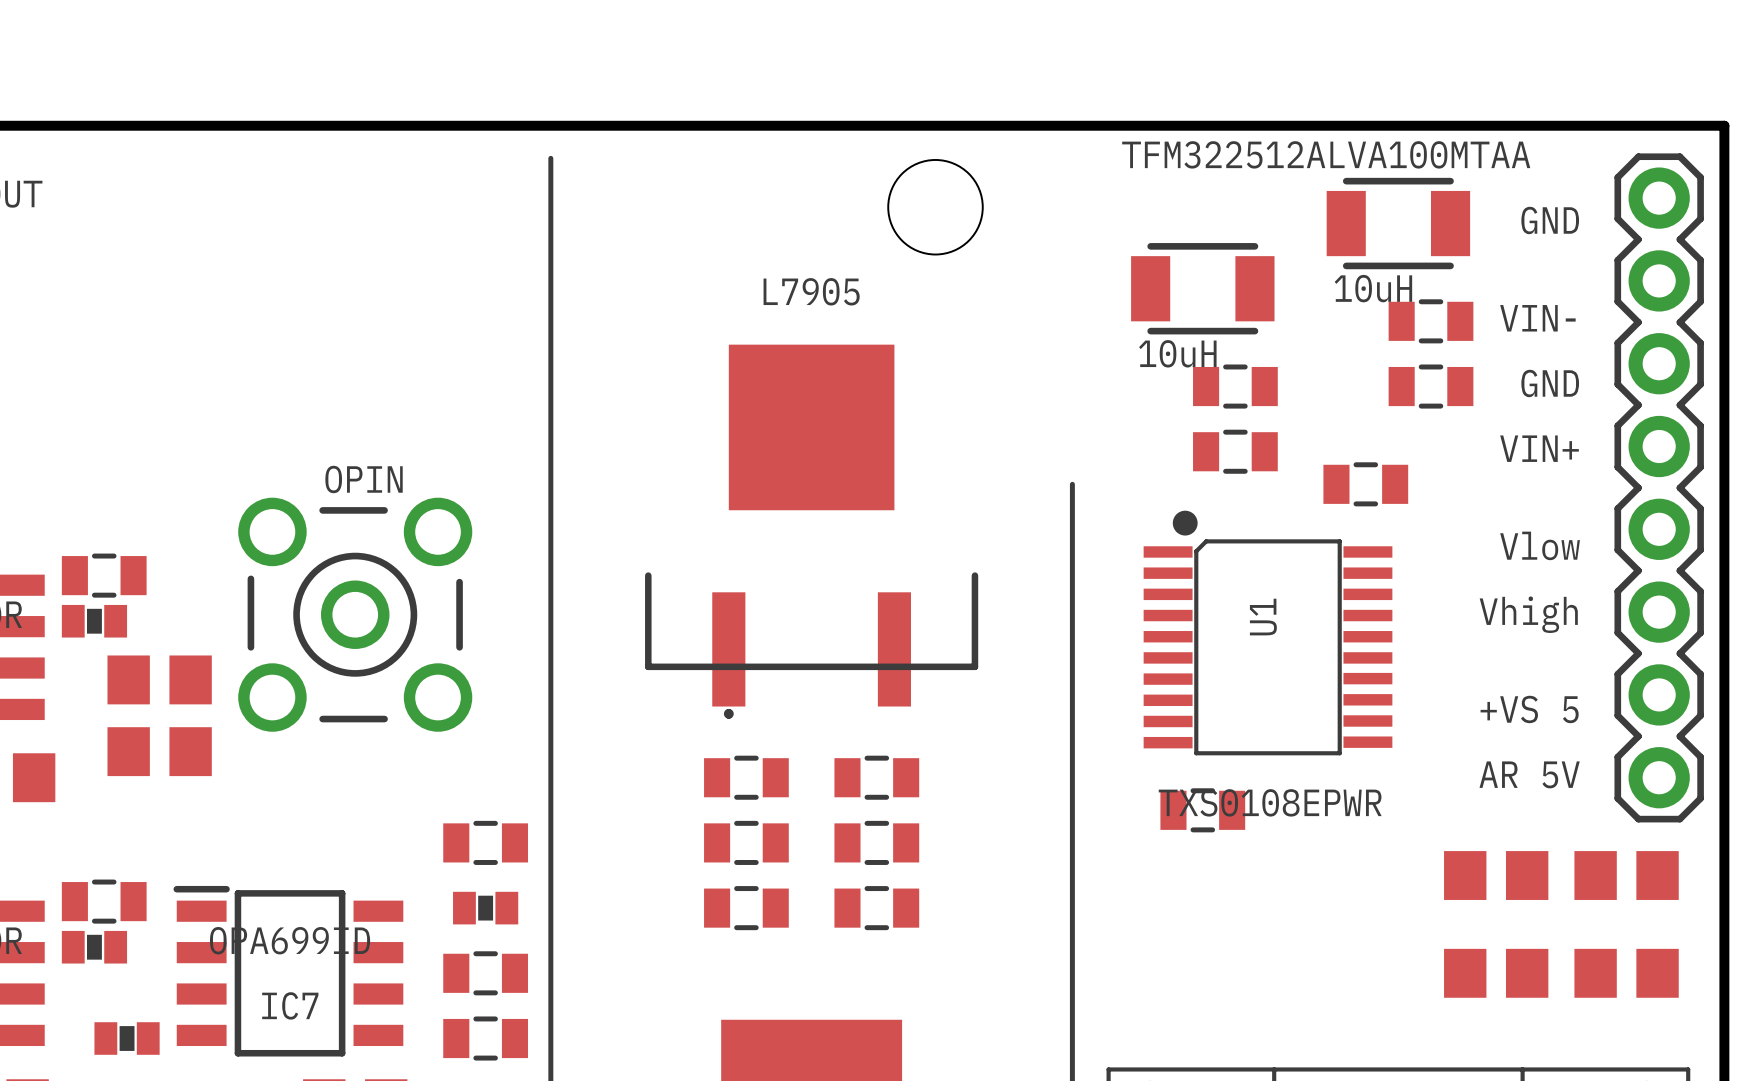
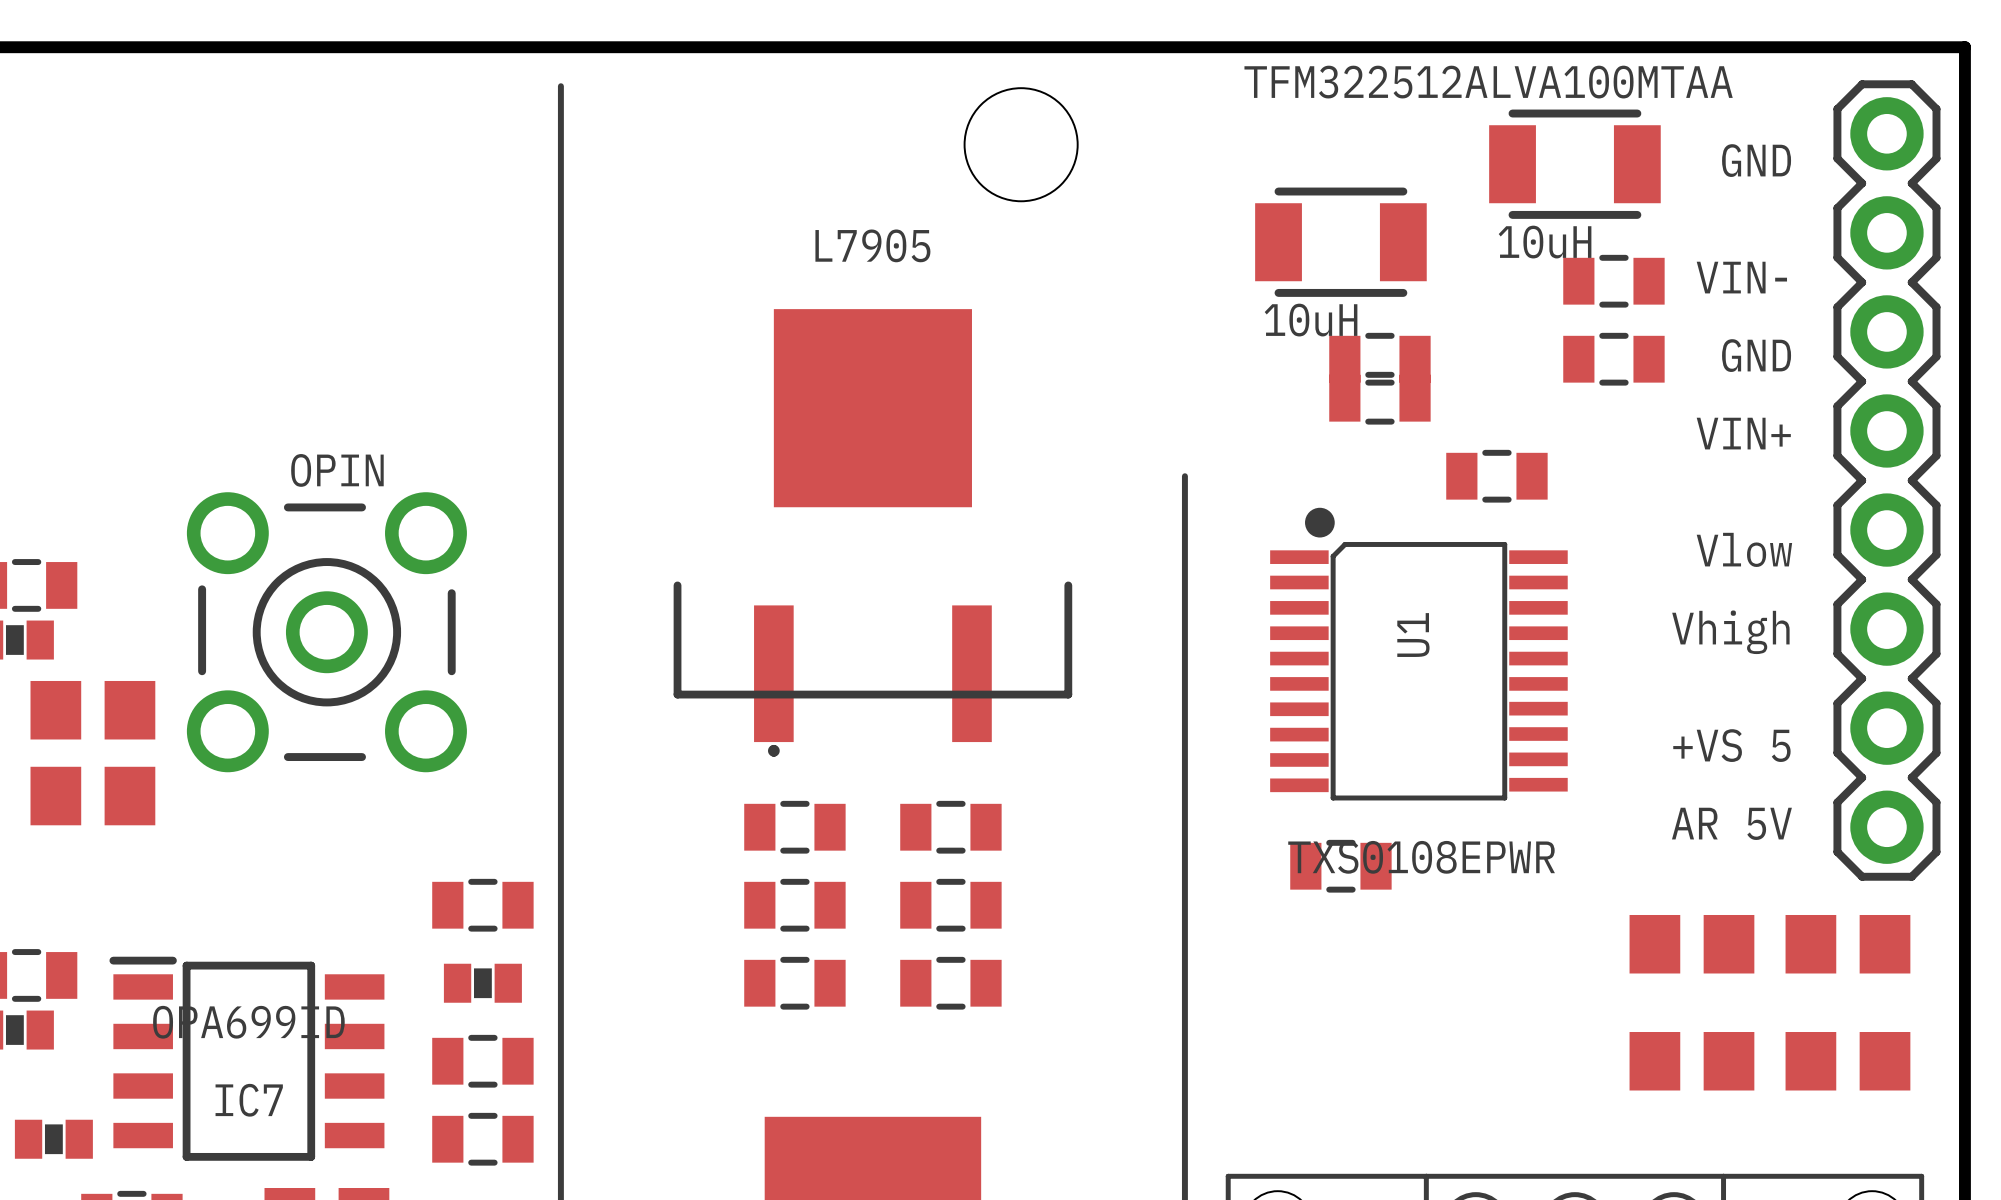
part position: (1235, 451) -> (1379, 398)
part position: (1365, 484) -> (1496, 476)

